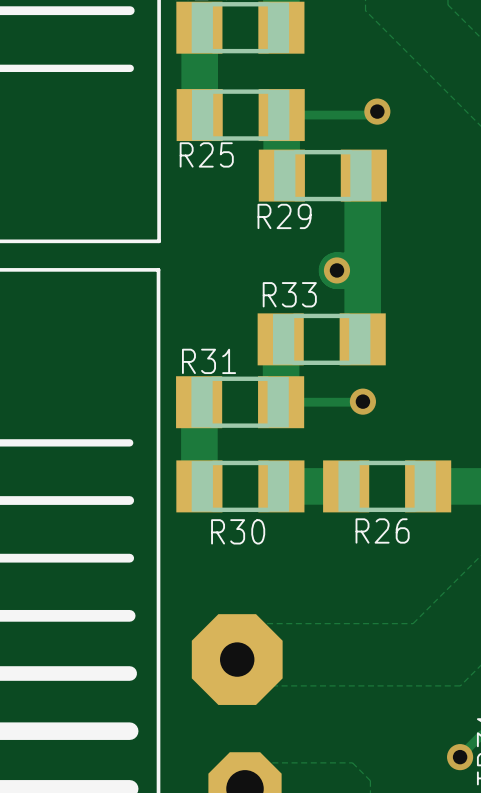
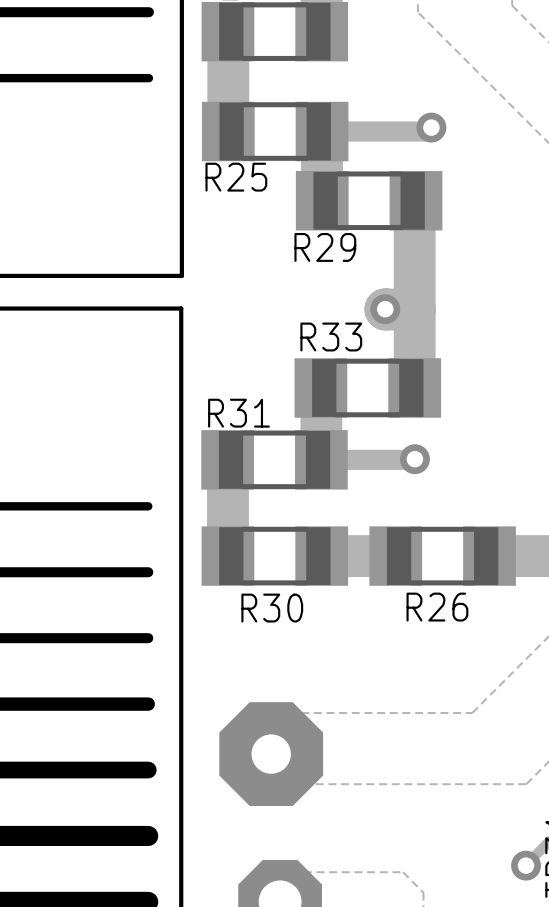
track width: thin (281, 115) (373, 115) -> thick (322, 131) (427, 131)
track width: thin (281, 402) (362, 402) -> thick (321, 459) (414, 459)

